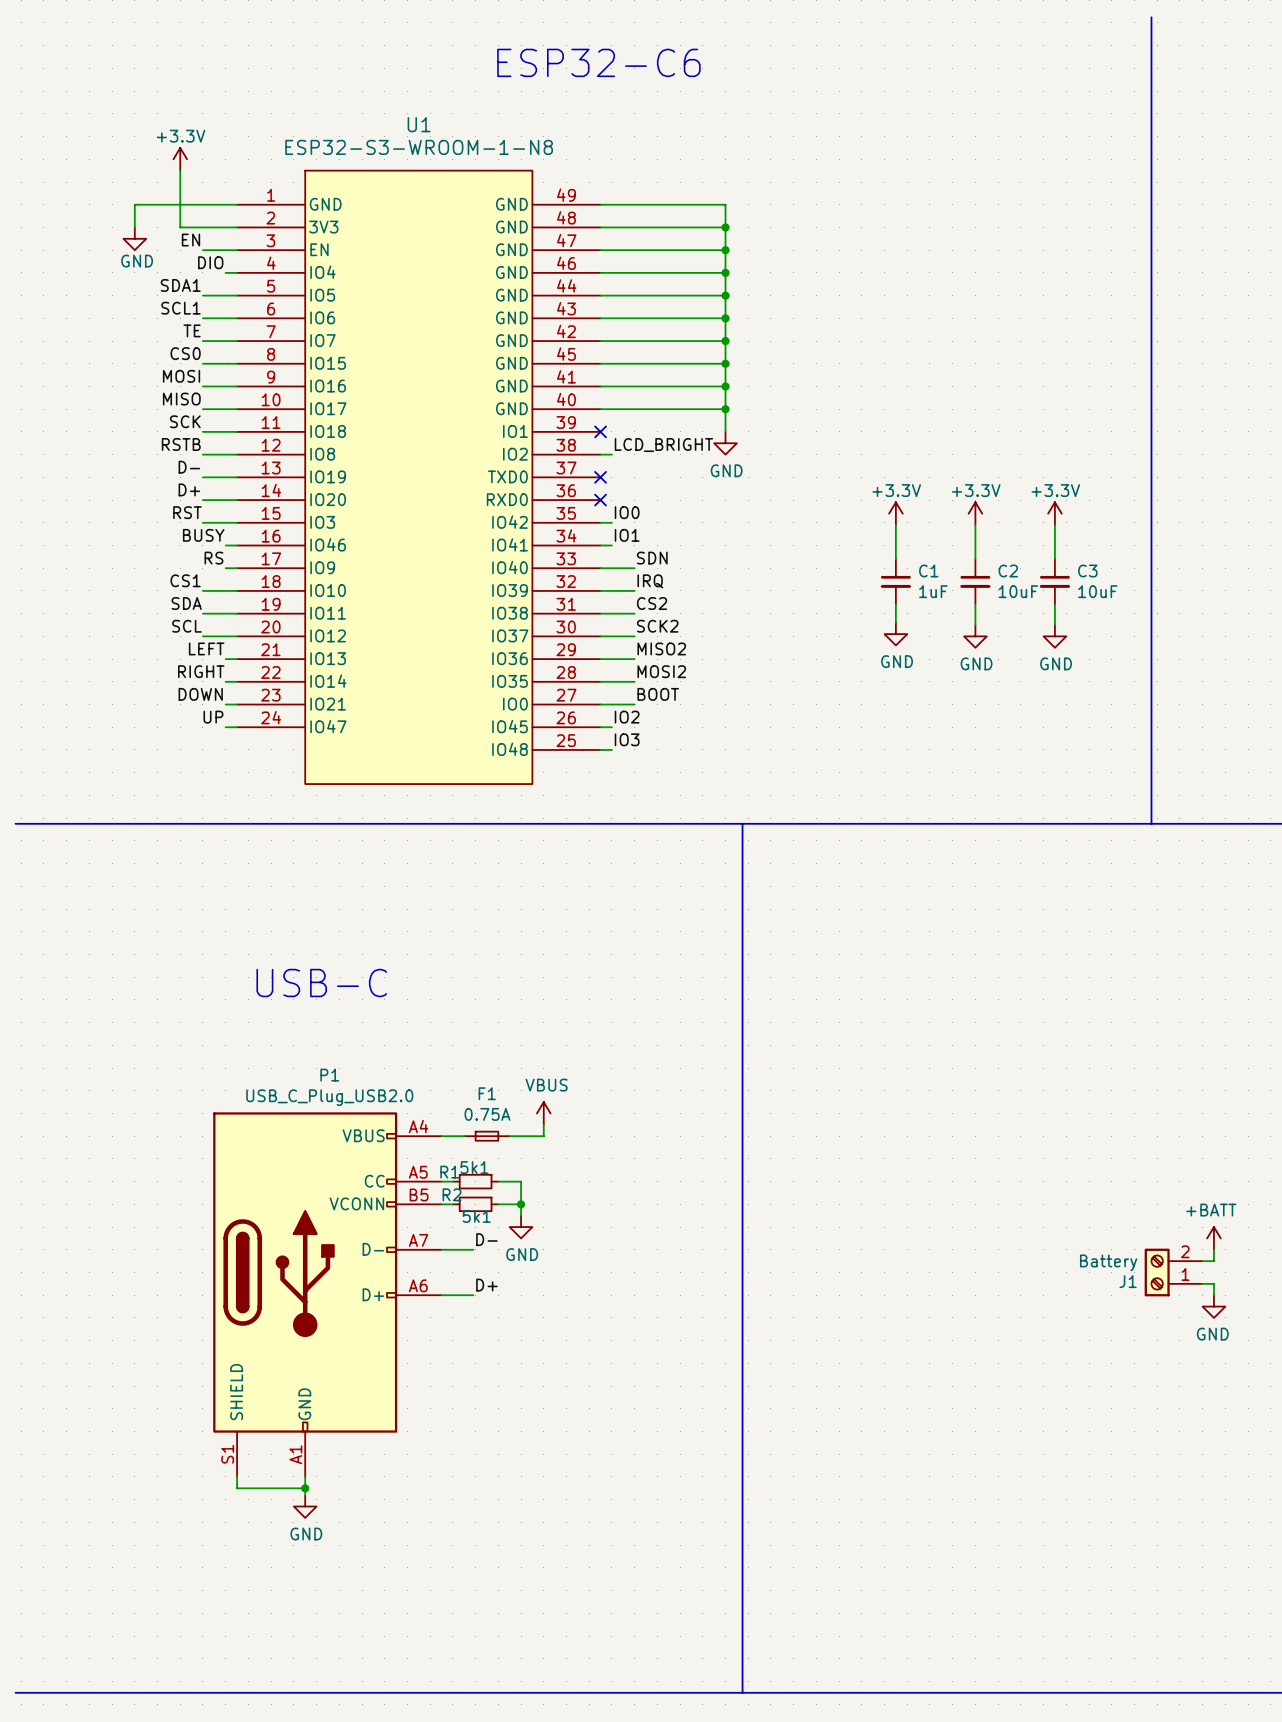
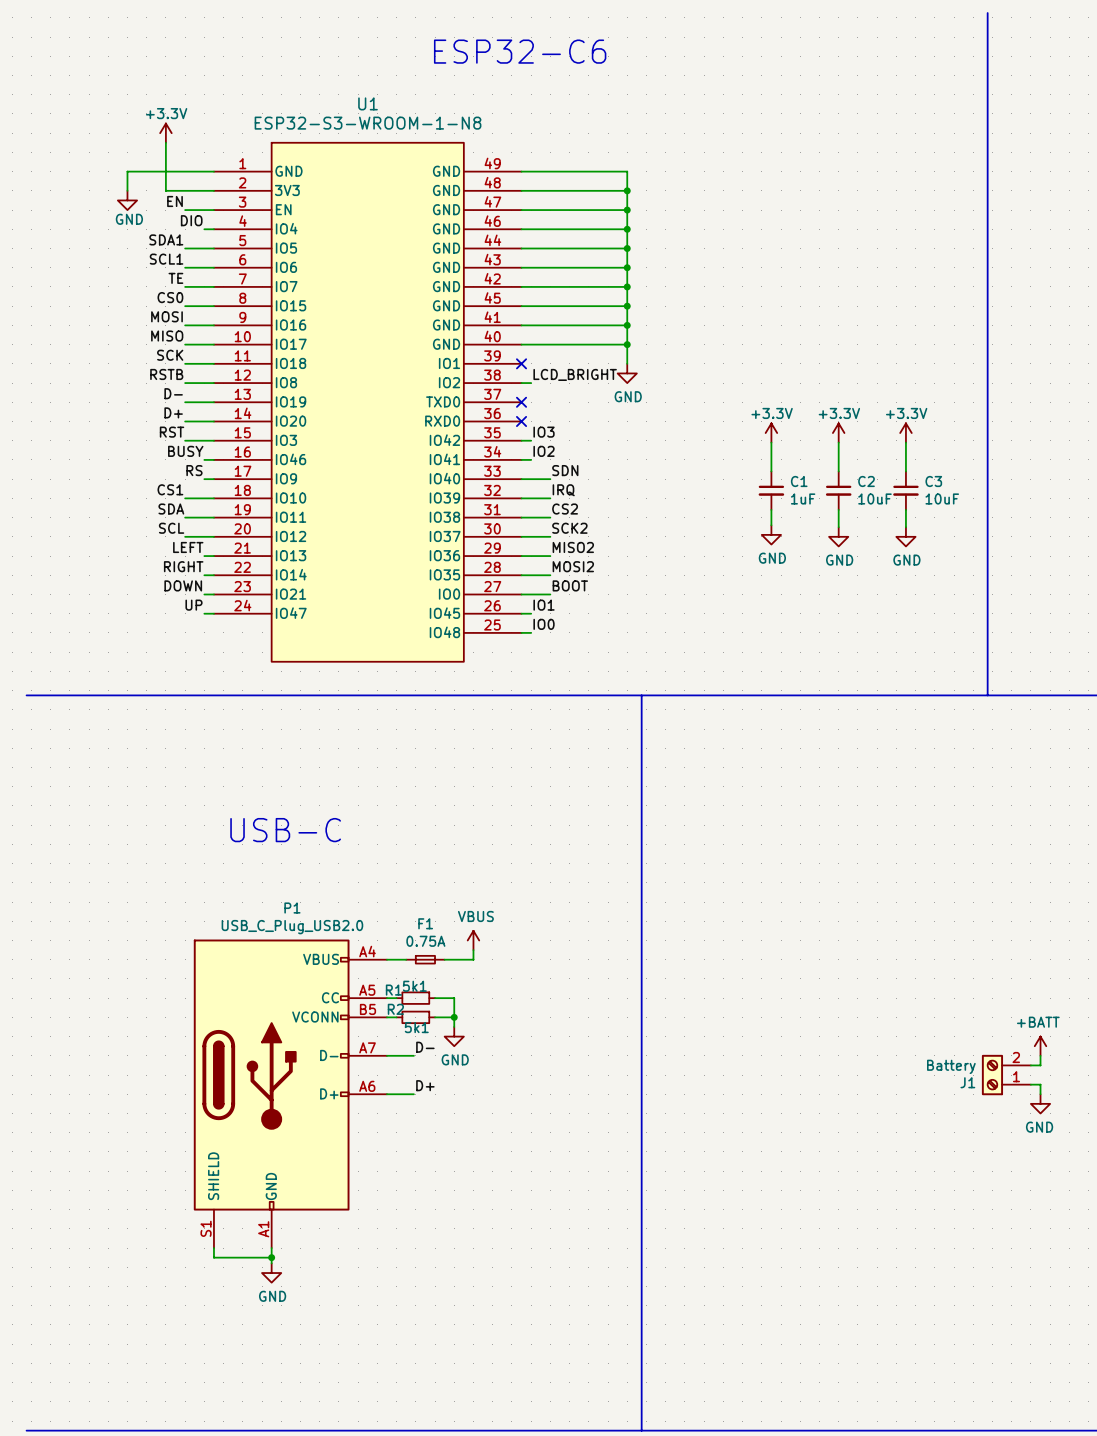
label: IO0 (627, 512) -> IO3 (544, 432)
label: IO1 (627, 535) -> IO2 (544, 451)
label: IO2 (627, 717) -> IO1 (544, 605)
label: IO3 (627, 739) -> IO0 (544, 624)

